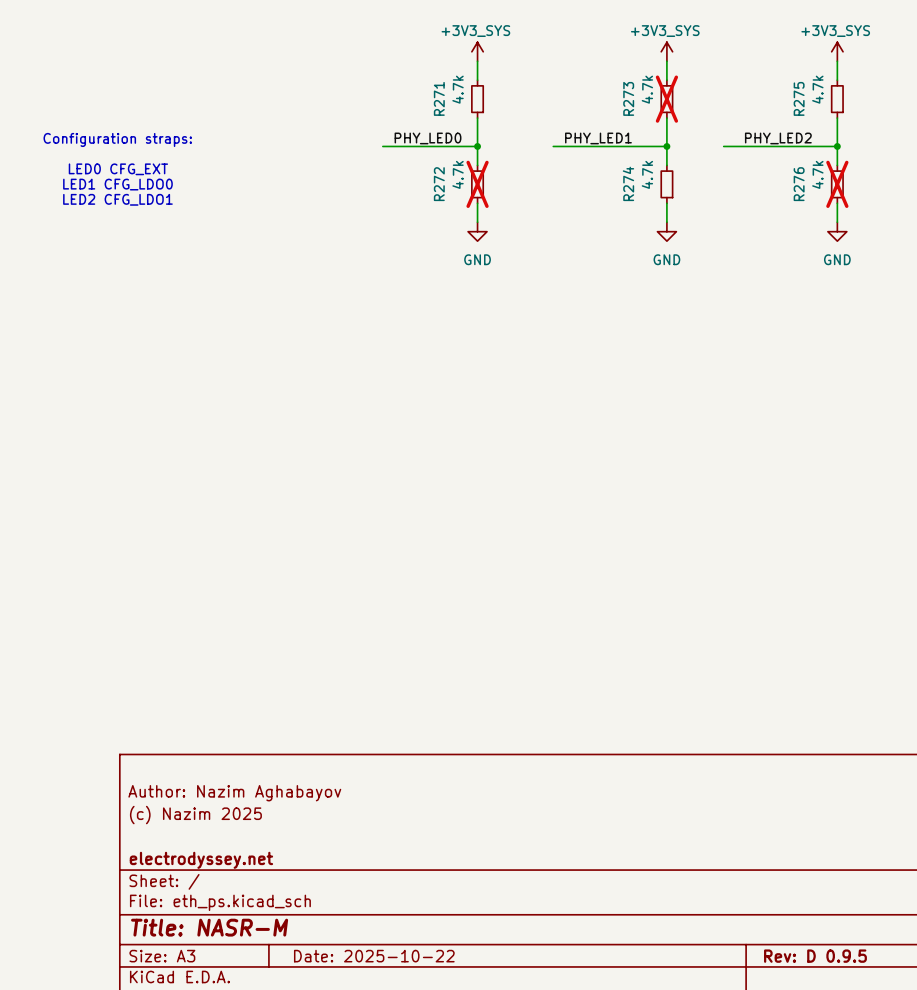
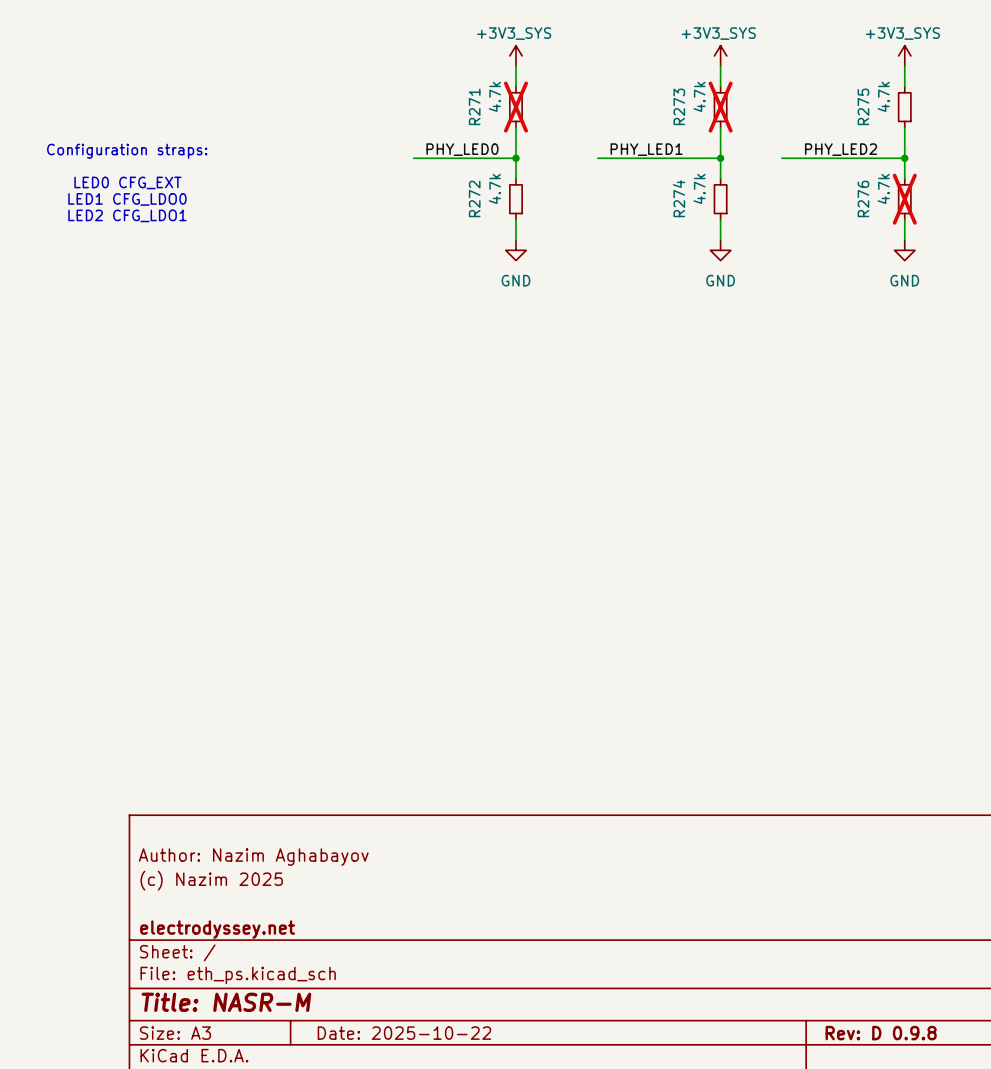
R271 do-not-place cross: none -> (515, 107)
R272 do-not-place cross: (477, 184) -> none
title block: Rev: D 0.9.5 (815, 956) -> Rev: D 0.9.8 (881, 1033)

